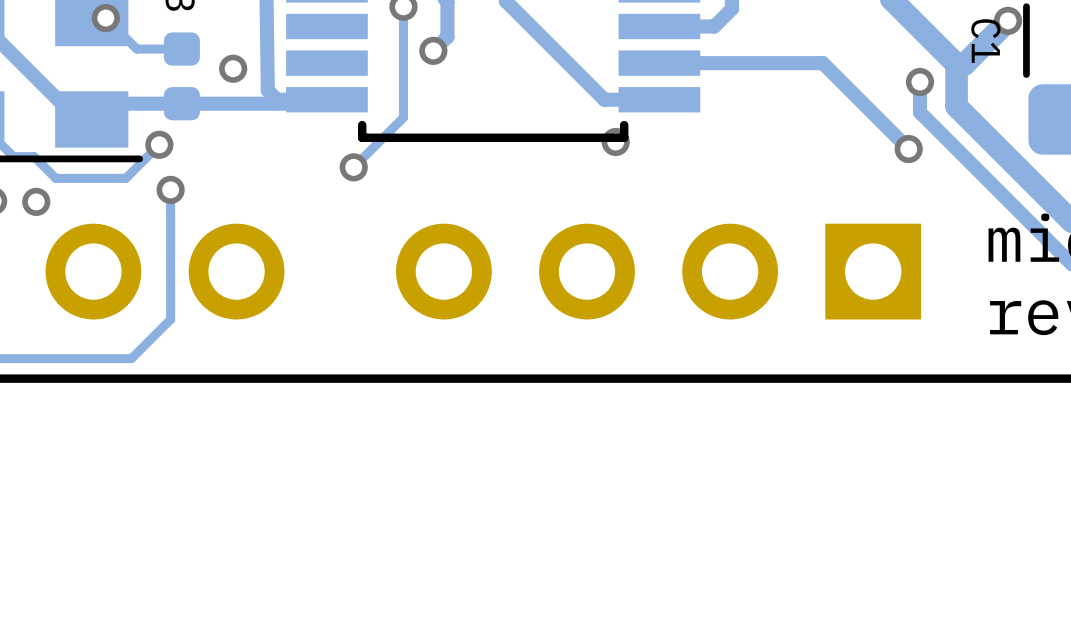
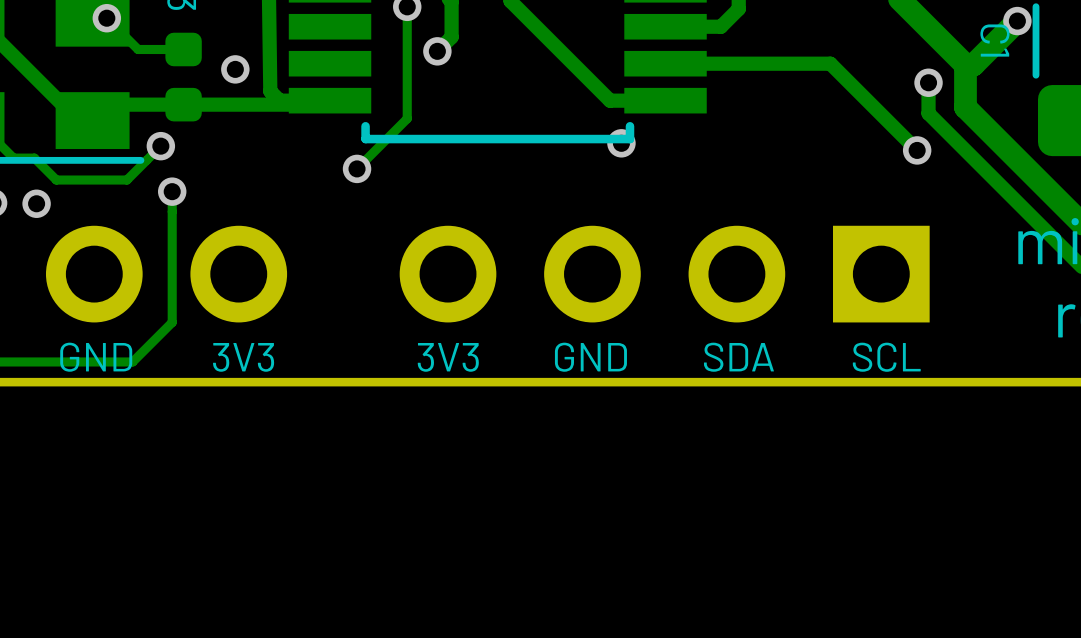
text: none -> GND (96, 357)
text: none -> 3V3 (243, 357)
text: none -> 3V3 (448, 357)
text: none -> GND (590, 357)
text: none -> SDA (738, 357)
text: none -> SCL (886, 357)

